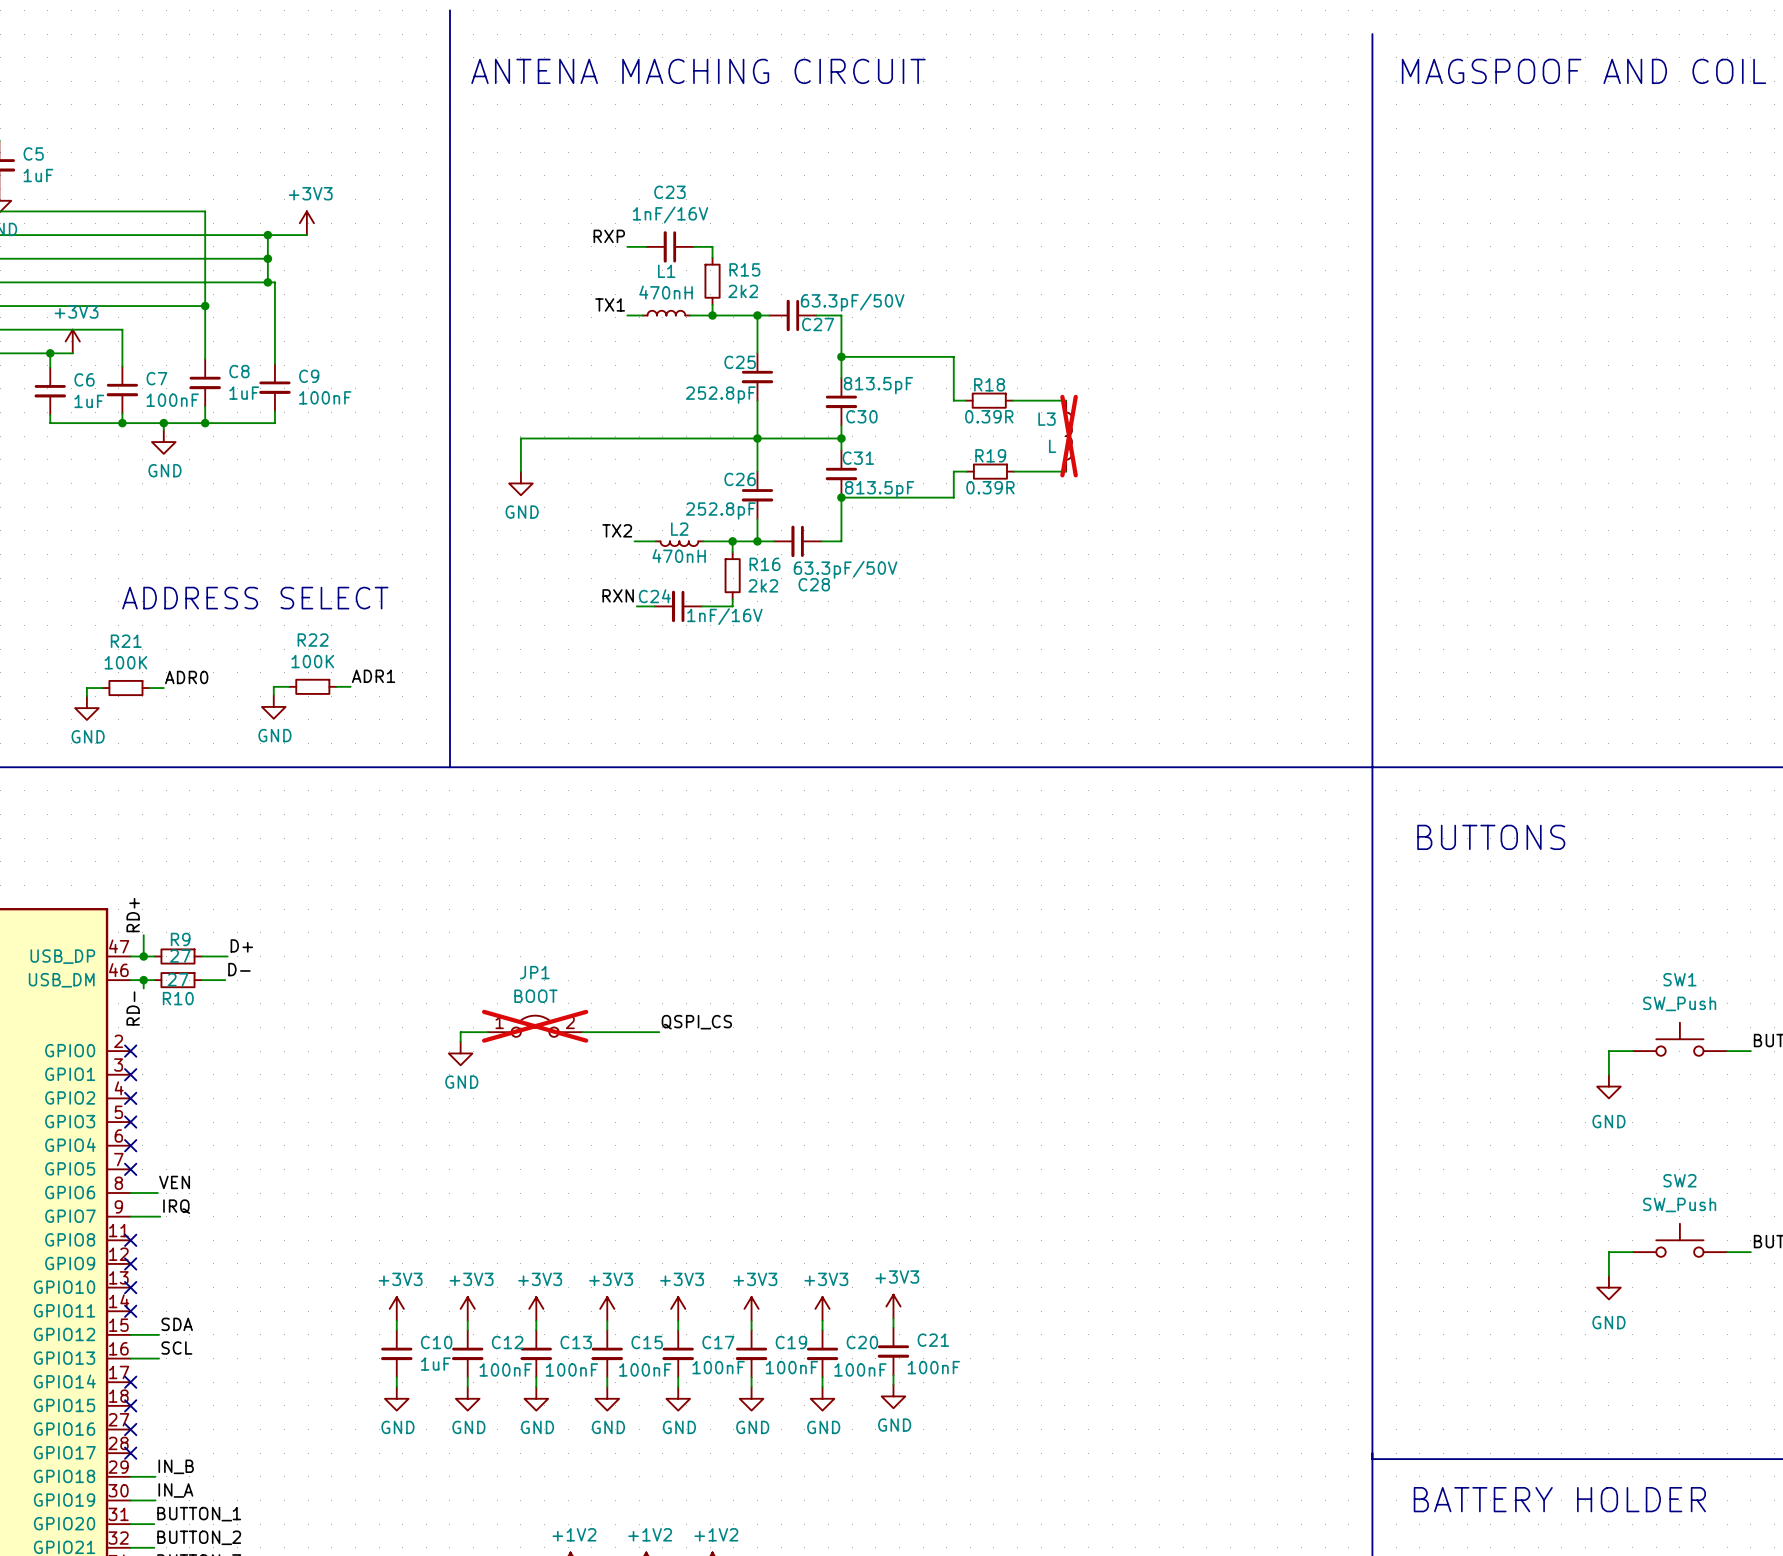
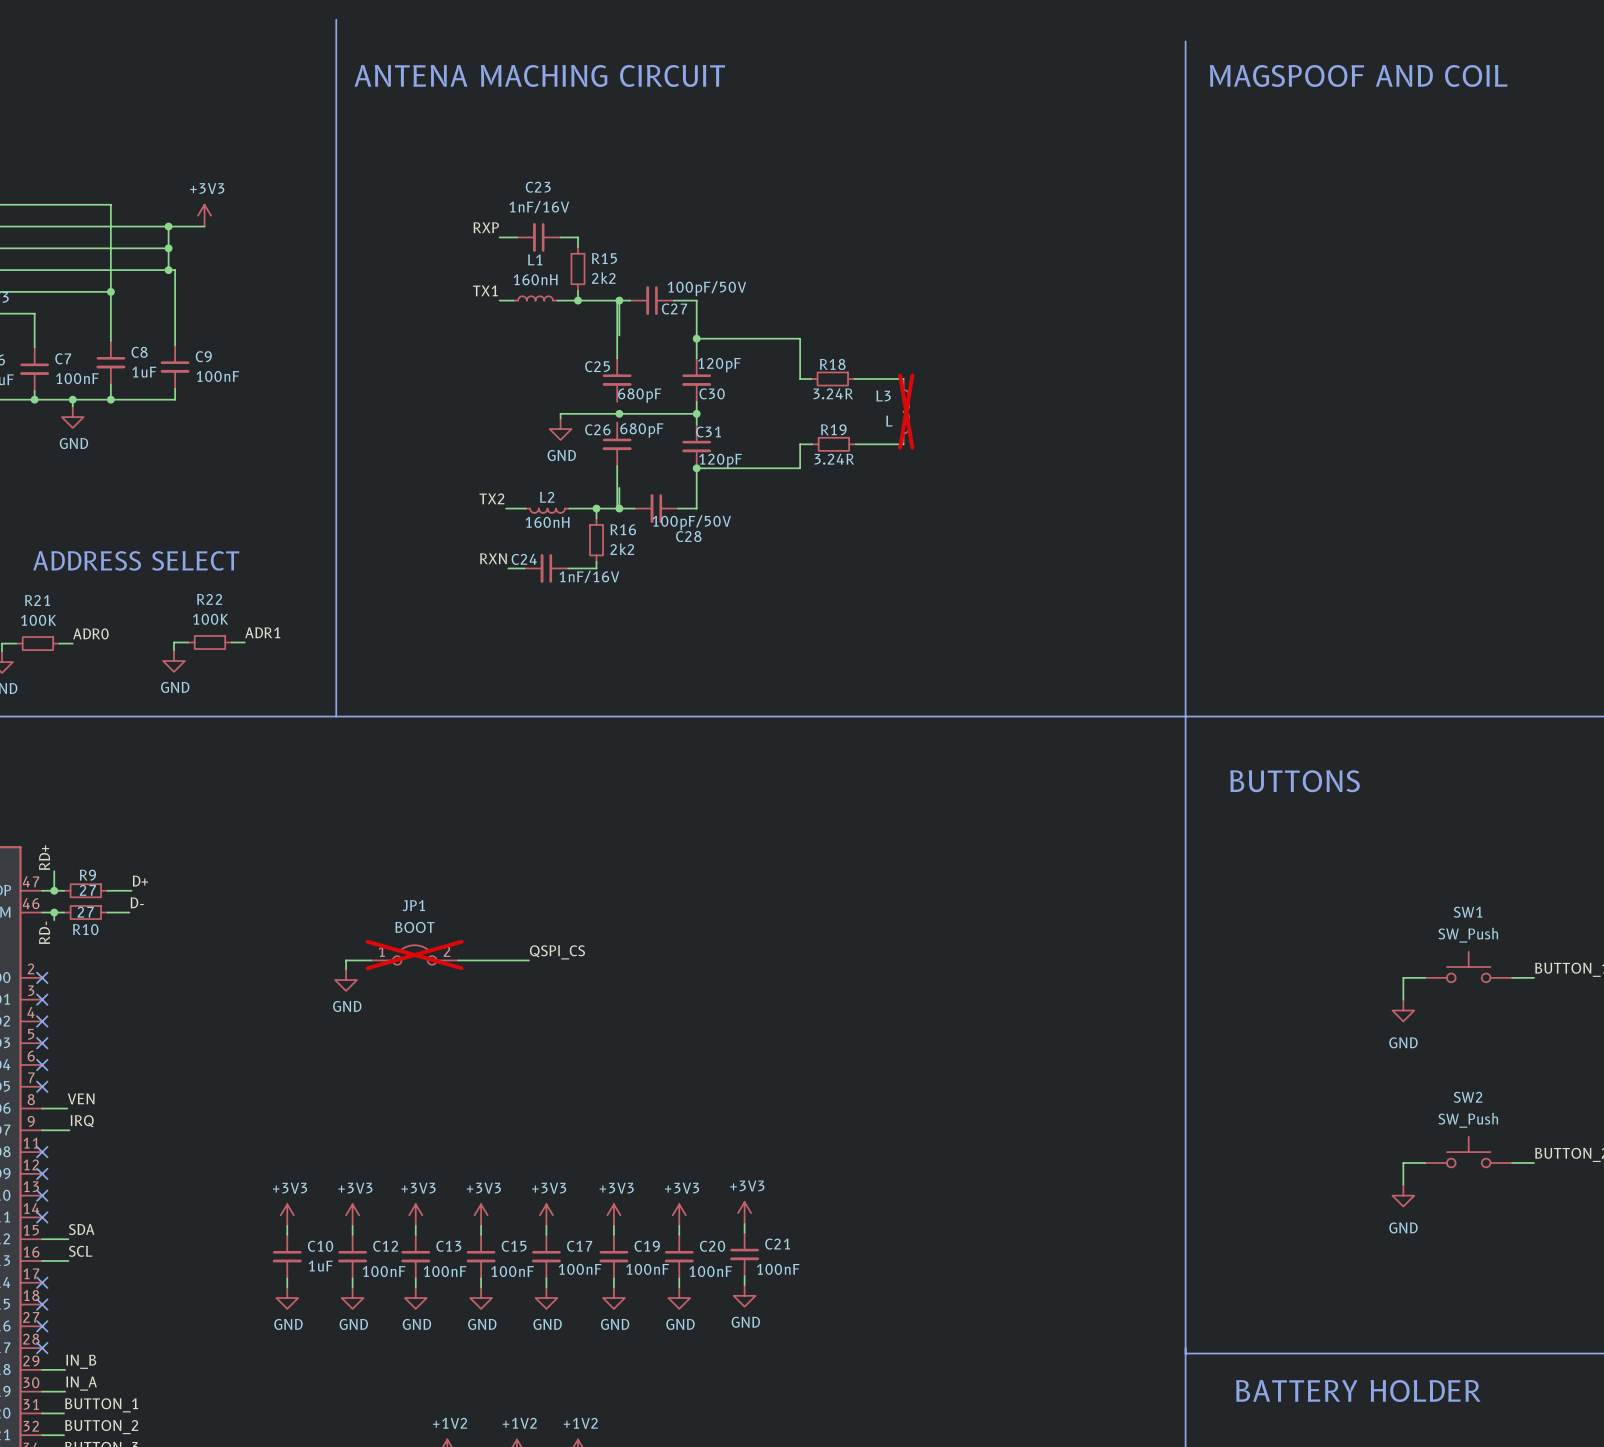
L1 value: 470nH (666, 292) -> 160nH (535, 279)
C27 value: 63.3pF/50V (852, 302) -> 100pF/50V (706, 288)
wire: none -> (617, 300) (617, 358)
C25 position: (757, 376) -> (617, 380)
C30 value: 813.5pF (878, 385) -> 120pF (719, 365)
C25 value: 252.8pF (720, 395) -> 680pF (639, 395)
wire: (757, 400) (757, 471) -> none
R18 value: 0.39R (989, 416) -> 3.24R (833, 393)
wire: (693, 438) (520, 438) (520, 471) -> (560, 413) (560, 418)
power symbol position: GND (520, 483) -> GND (560, 429)
R19 value: 0.39R (990, 487) -> 3.24R (834, 459)
C31 value: 813.5pF (879, 489) -> 120pF (720, 460)
wire: none -> (617, 466) (617, 508)
C26 position: (757, 495) -> (617, 444)
C26 value: 252.8pF (720, 510) -> 680pF (641, 430)
L2 value: 470nH (679, 556) -> 160nH (547, 522)
C28 value: 63.3pF/50V (845, 569) -> 100pF/50V (691, 522)
C28 name position: C28 (814, 584) -> C28 (688, 536)

